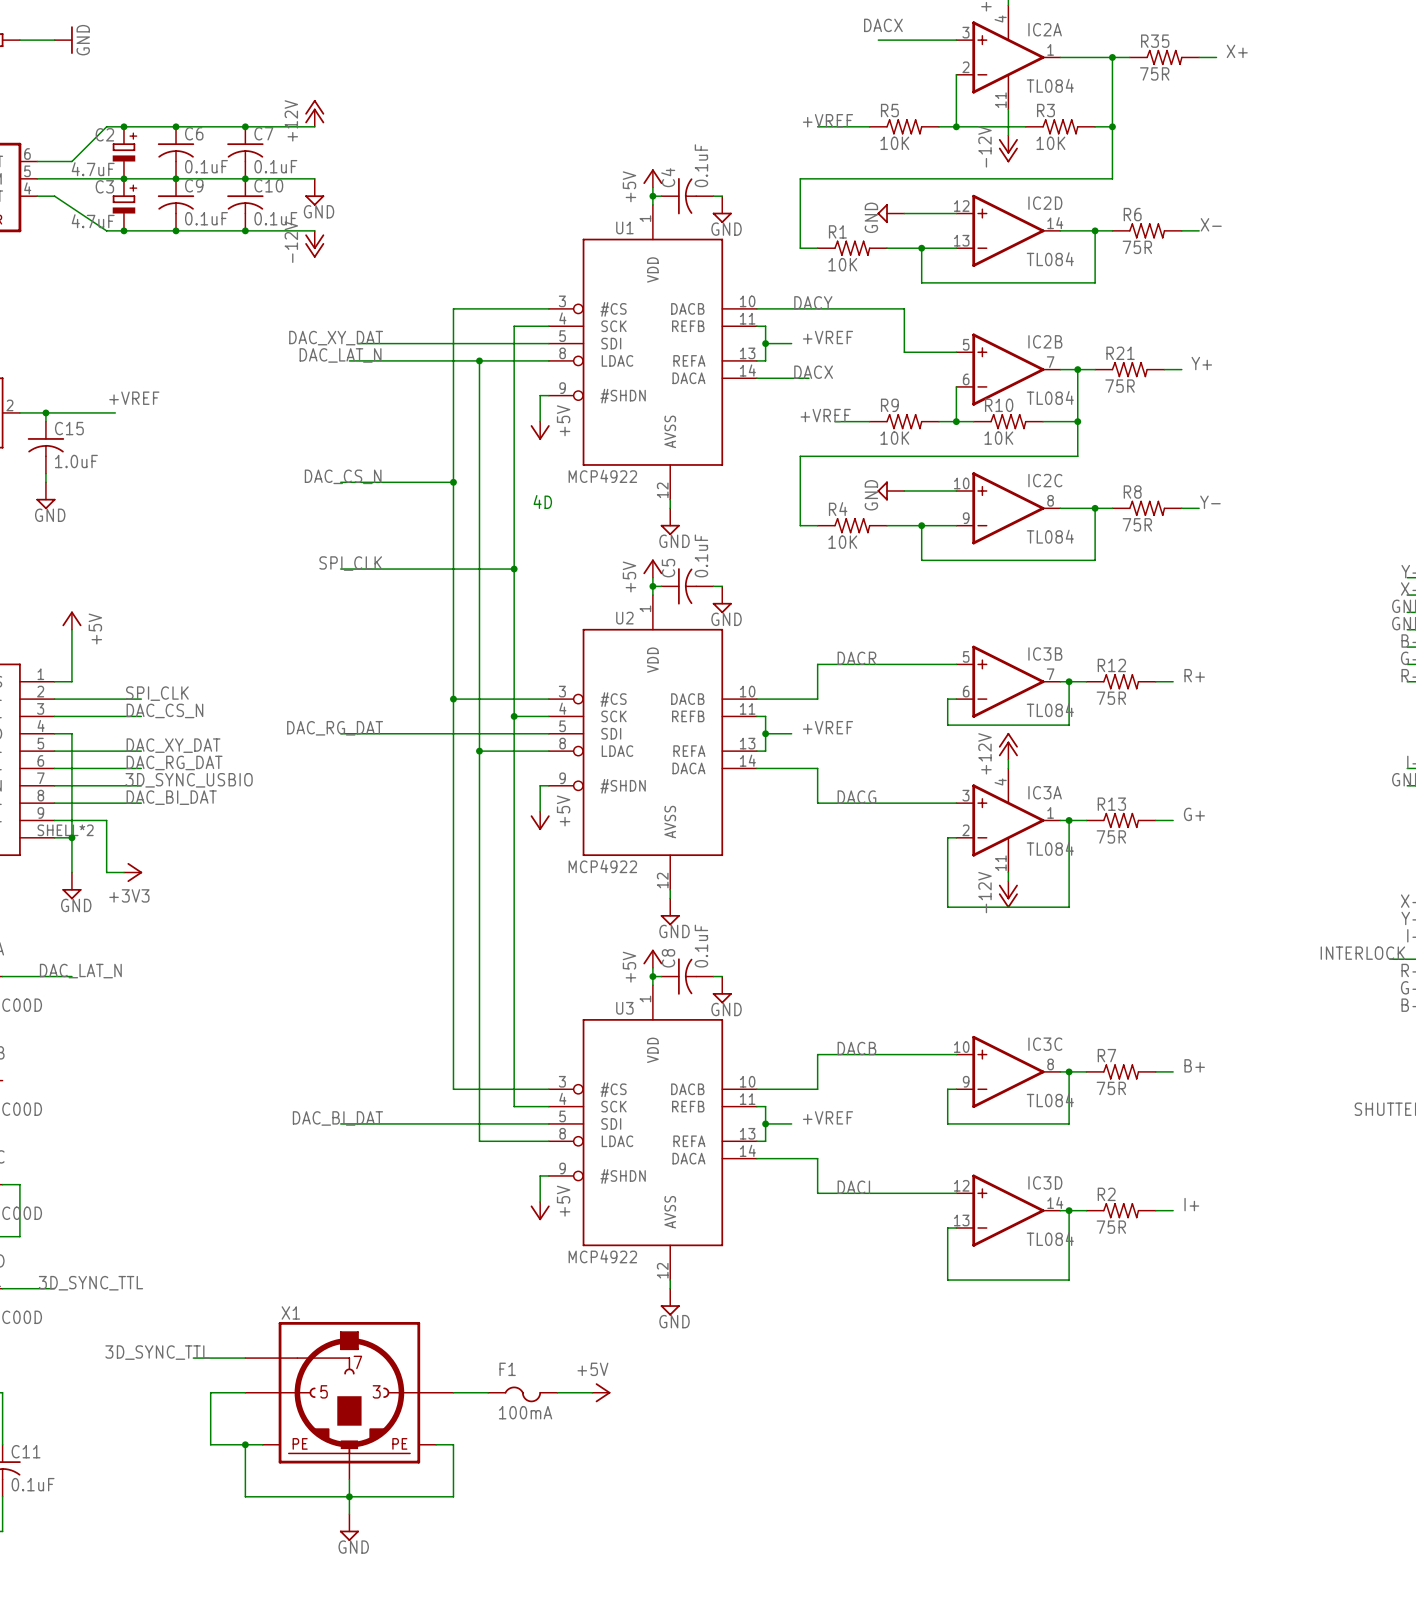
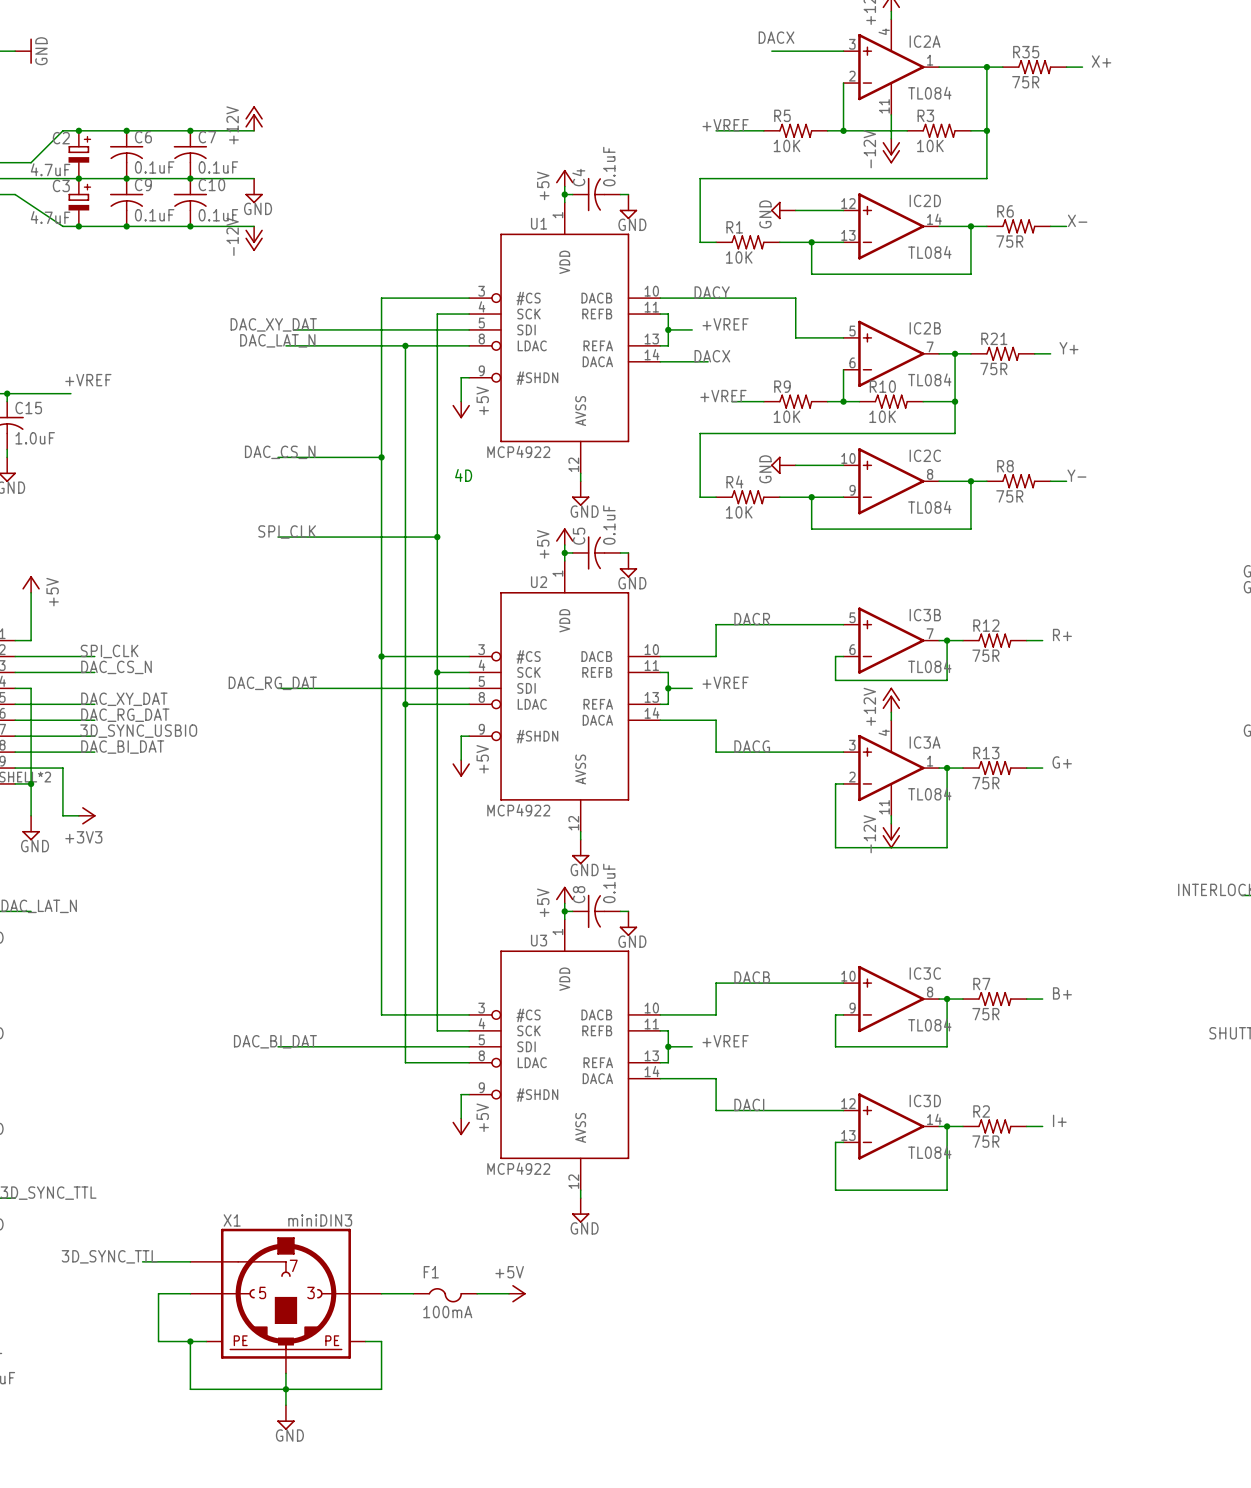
X1 value: none -> miniDIN3 (320, 1220)

